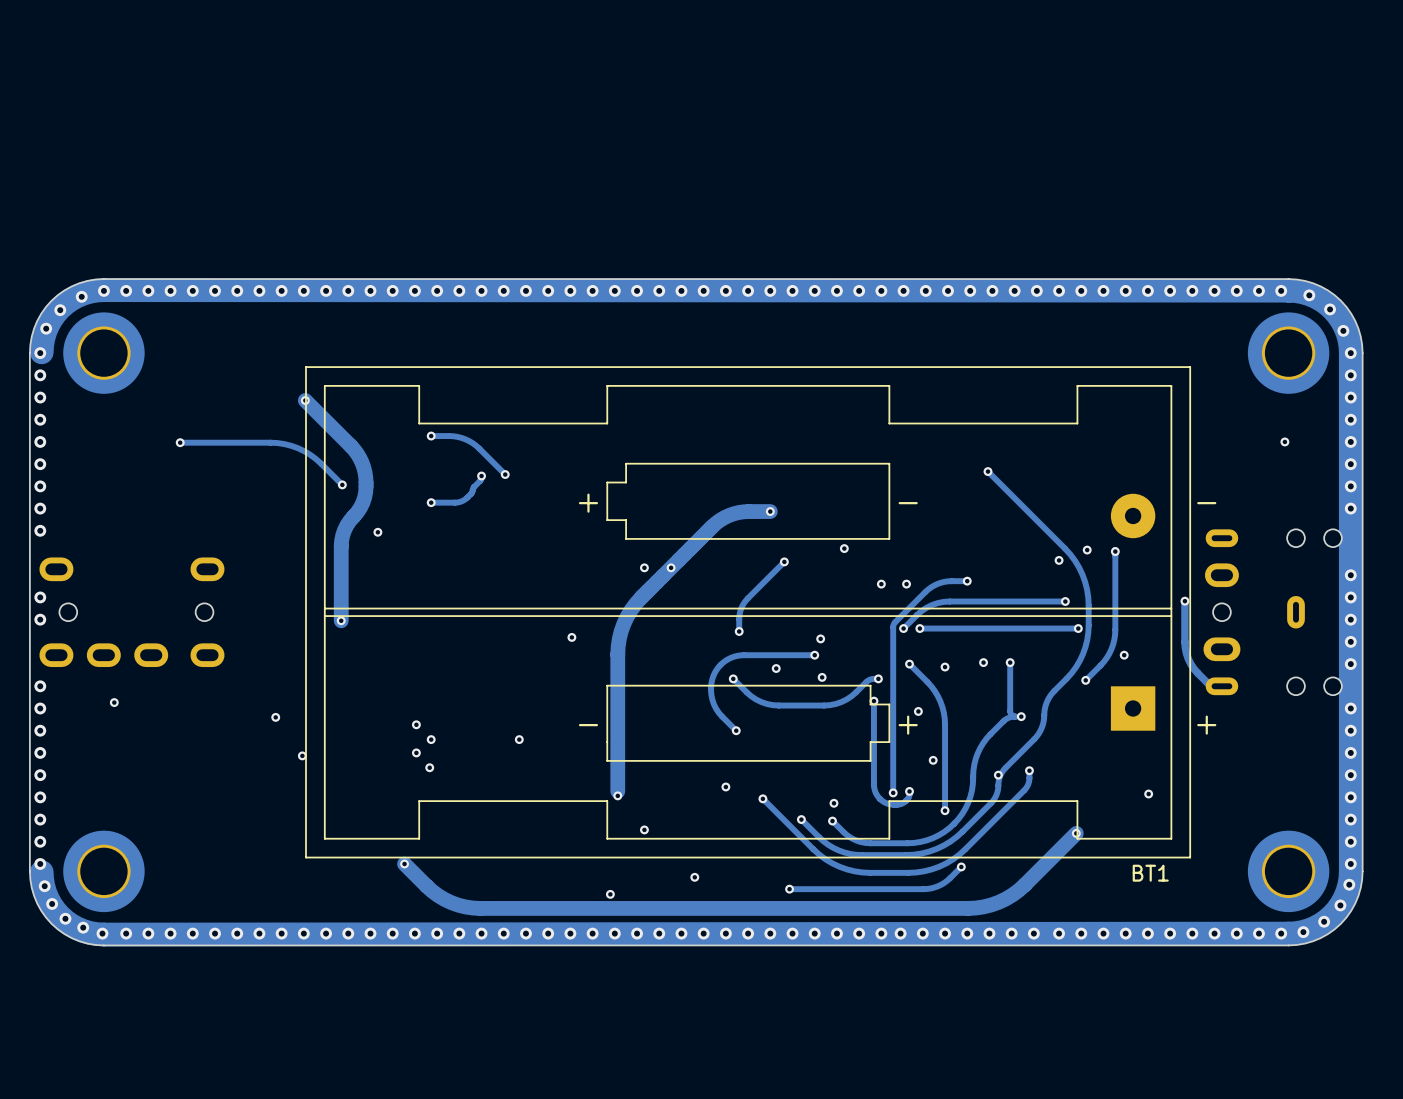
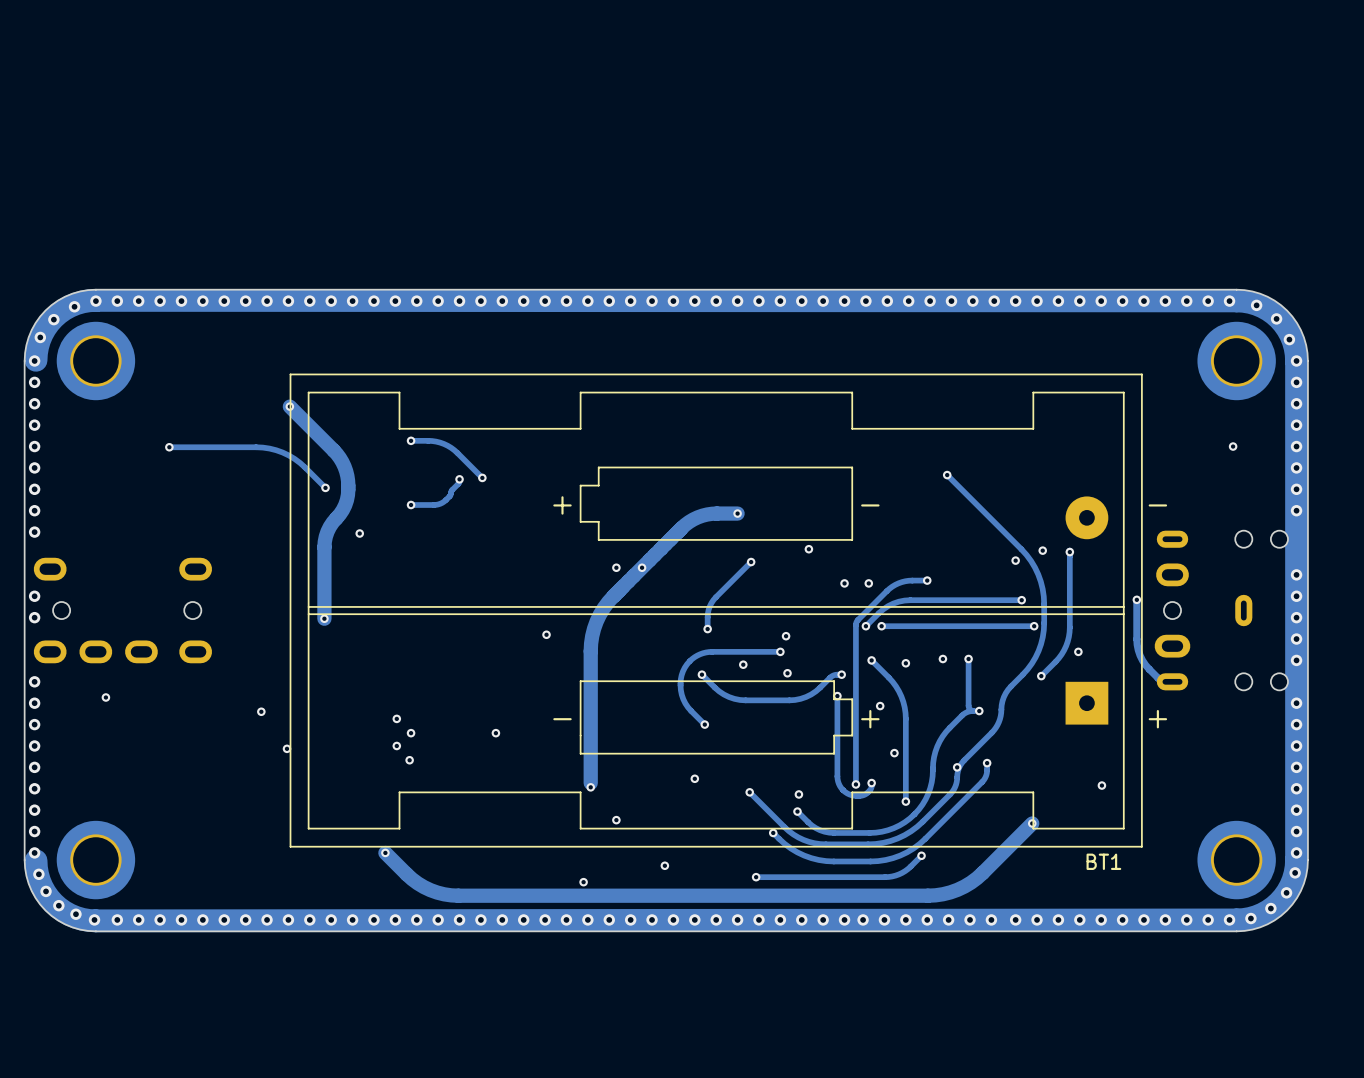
track: (762, 798) (807, 843) -> none
via: (762, 798) -> none
track: none -> (749, 792) (767, 810)
via: none -> (749, 792)
via: (801, 819) -> none
via: none -> (773, 832)

